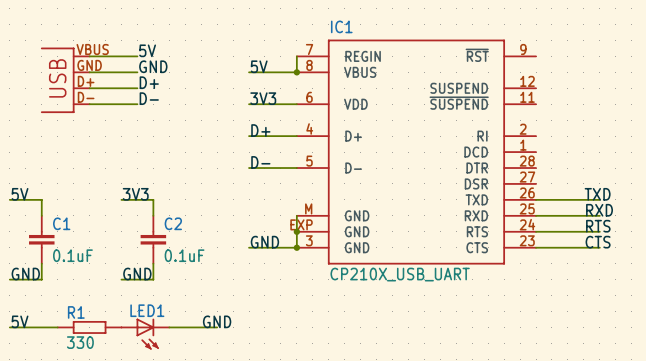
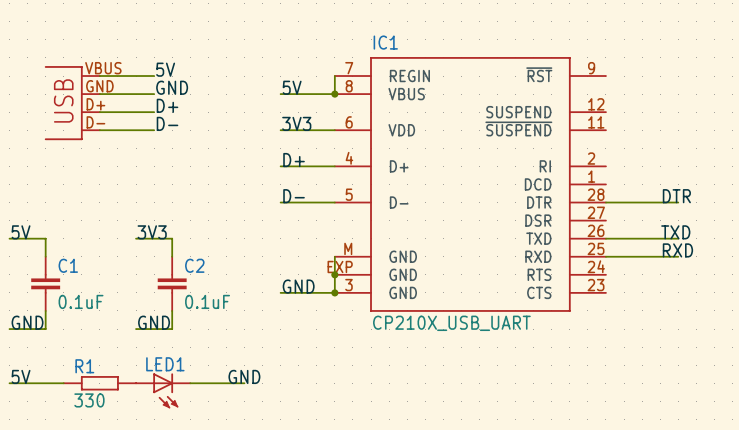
label: none -> DTR (676, 196)
label: RTS (598, 226) -> none
wire: (536, 231) (599, 231) -> (605, 202) (678, 202)
label: CTS (598, 242) -> none
wire: (536, 247) (599, 247) -> none

